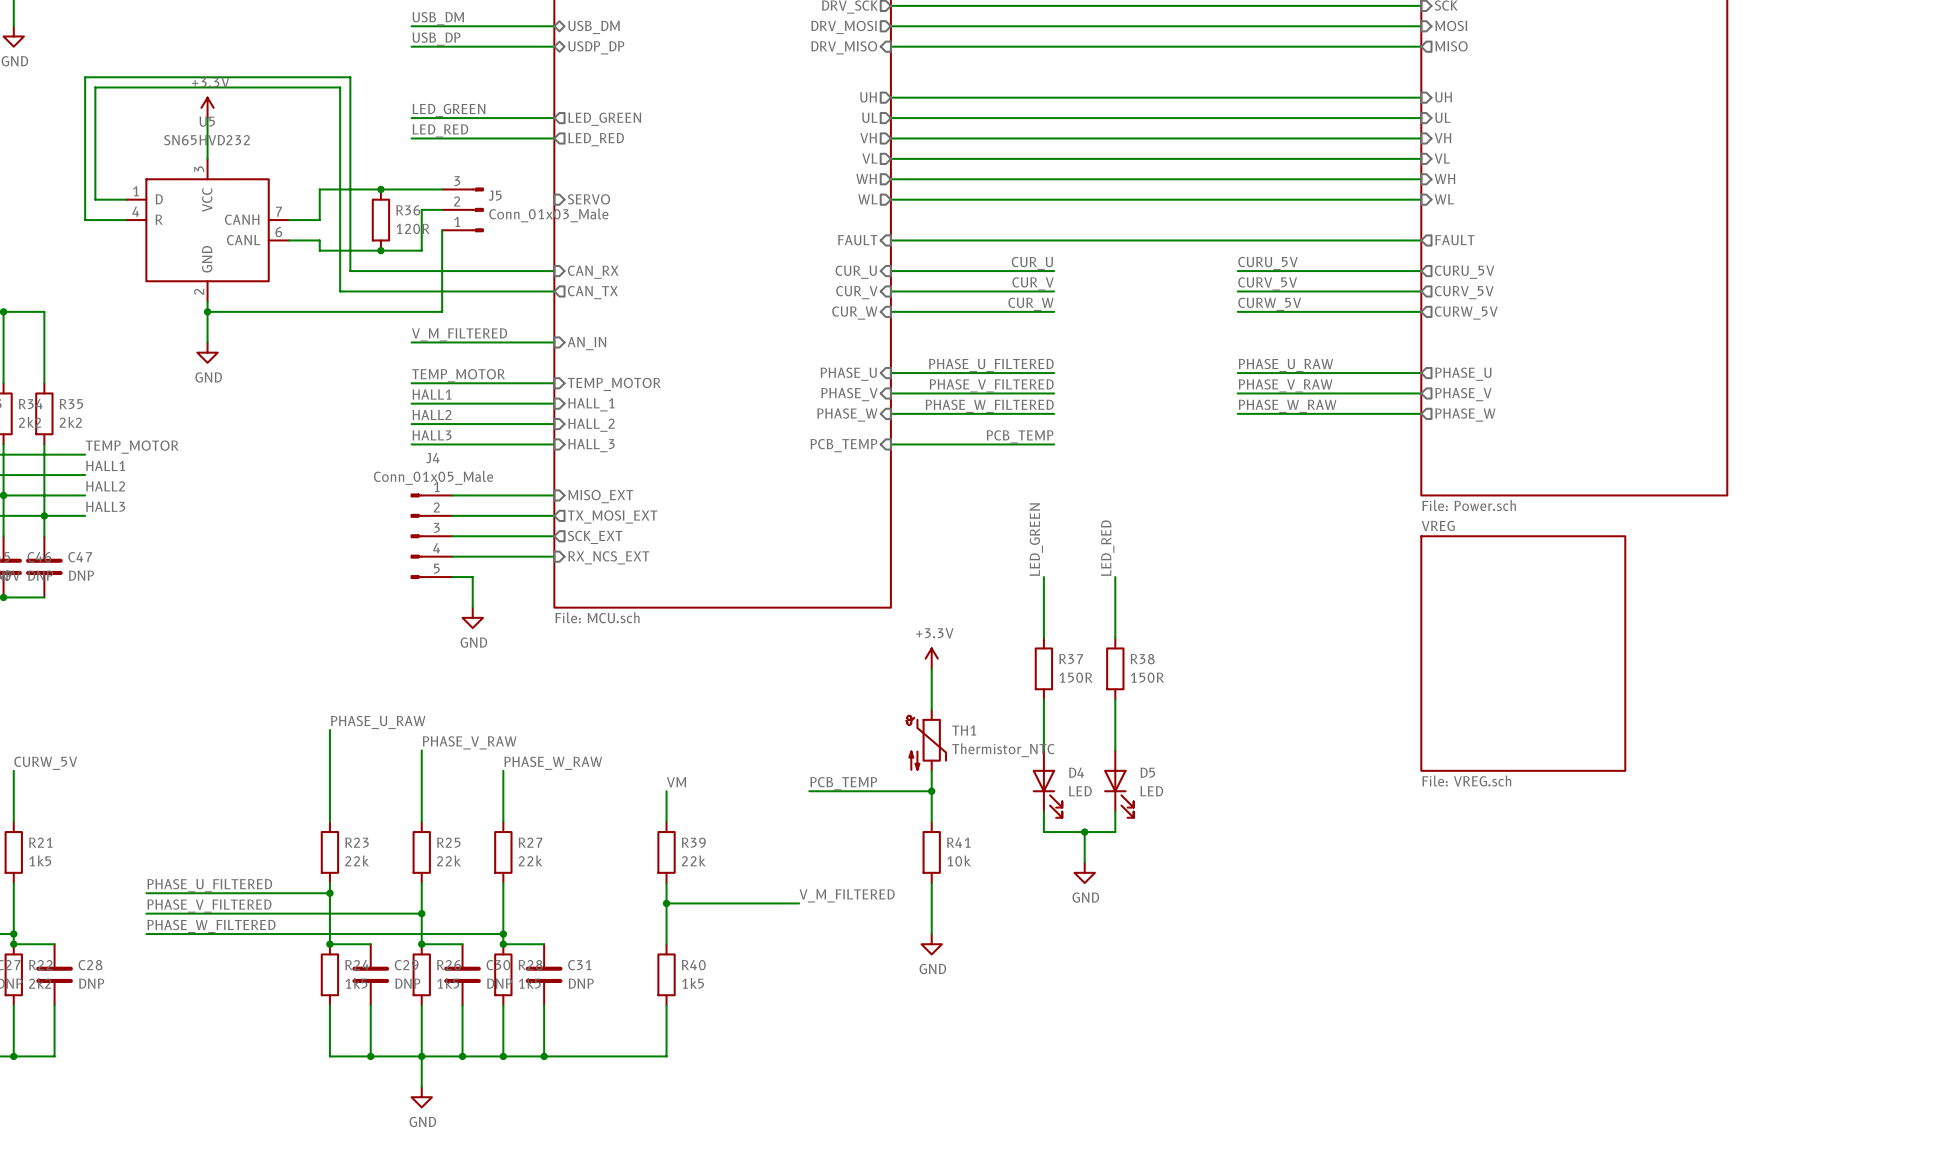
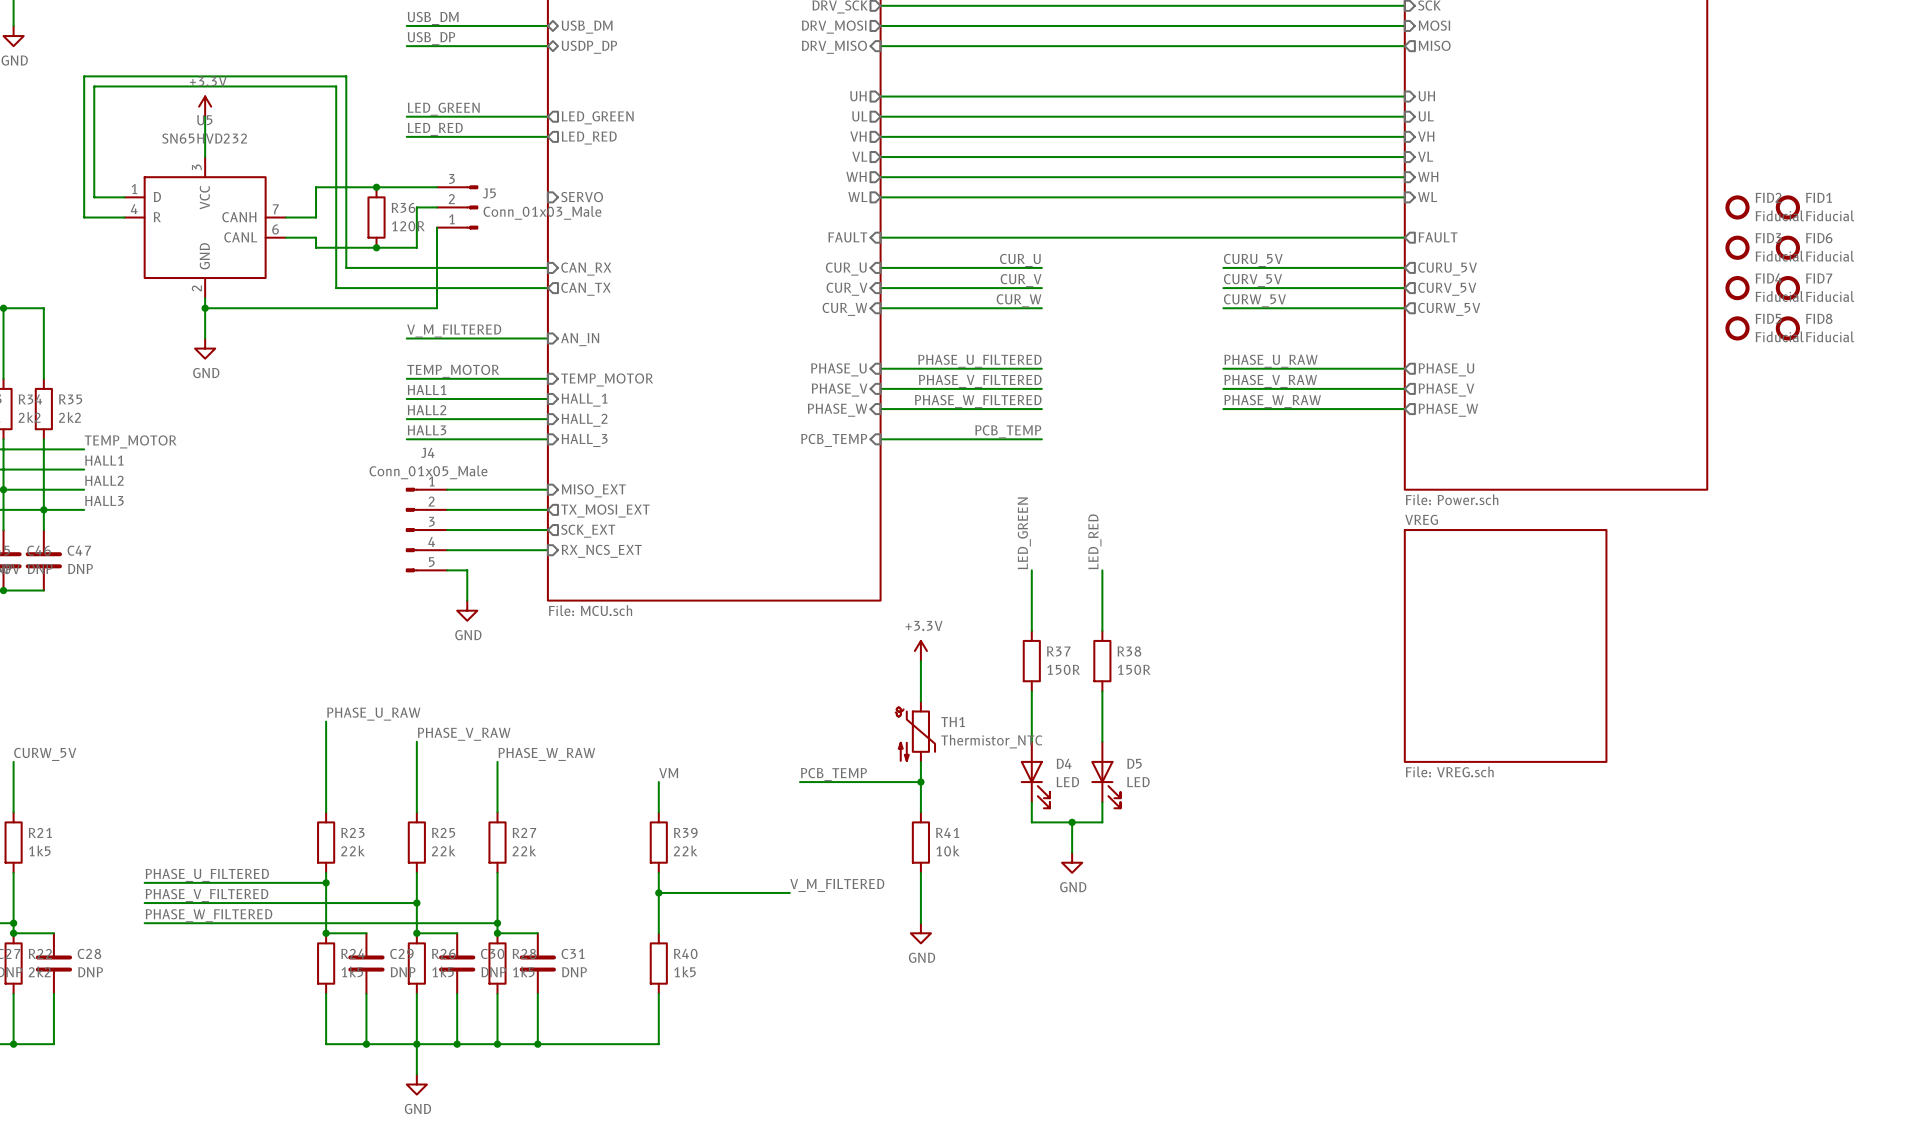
FID2: none -> Fiducial (1737, 207)
FID1: none -> Fiducial (1787, 207)
FID3: none -> Fiducial (1737, 247)
FID6: none -> Fiducial (1787, 247)
FID4: none -> Fiducial (1737, 288)
FID7: none -> Fiducial (1787, 288)
FID5: none -> Fiducial (1737, 328)
FID8: none -> Fiducial (1787, 328)

